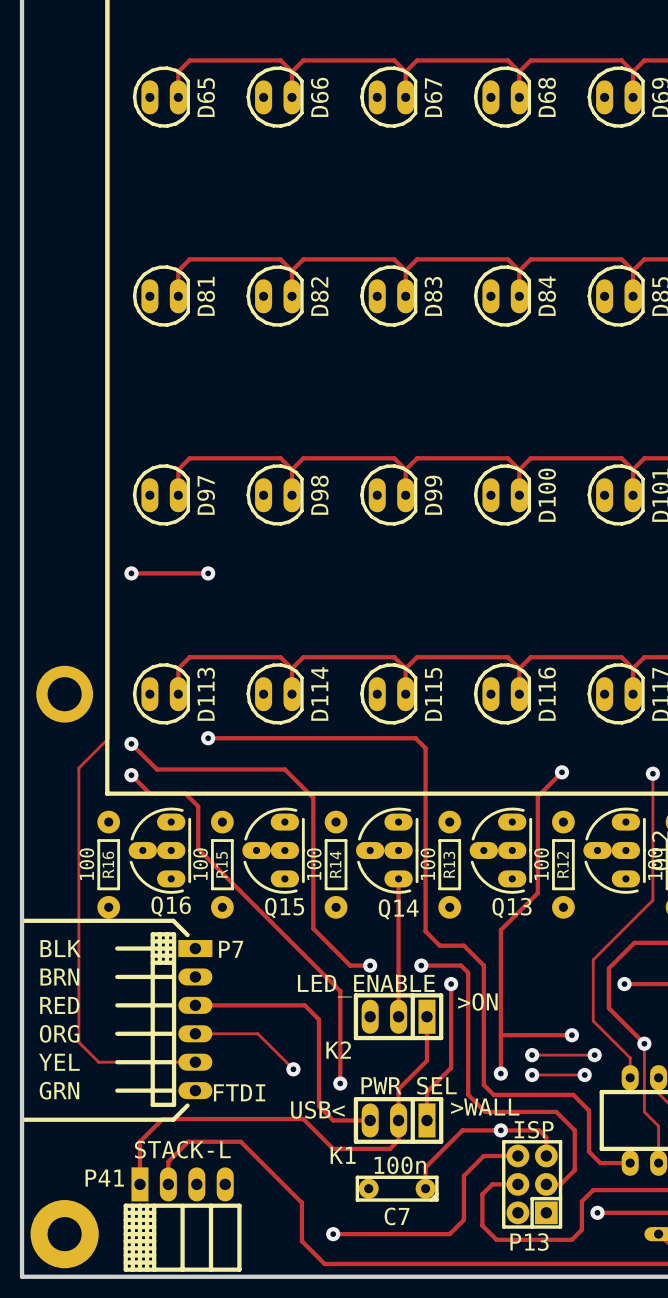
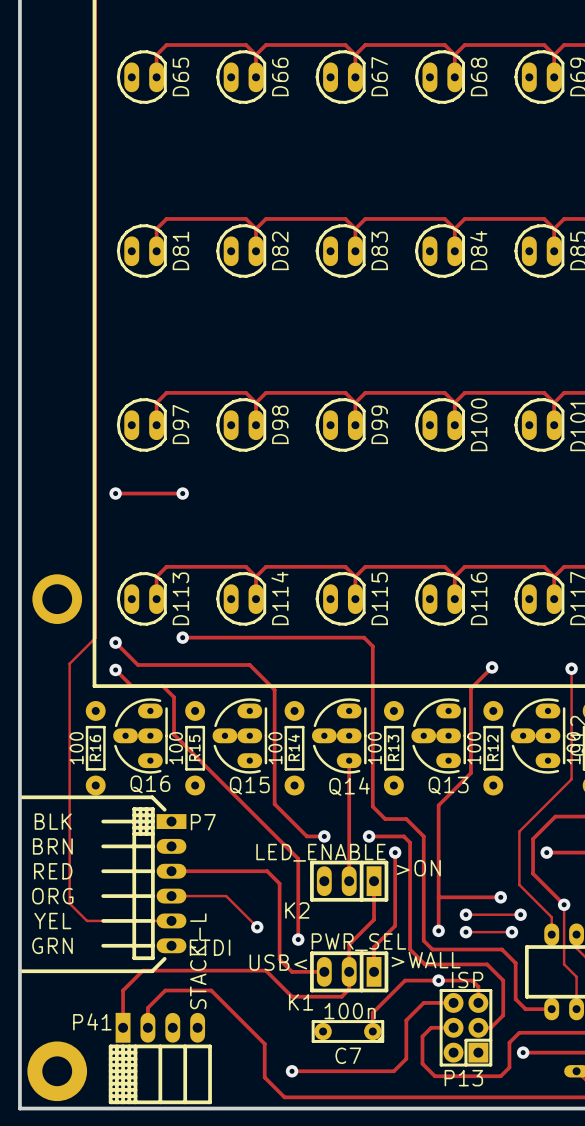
P41 value rotation: 0° (182, 1149) -> 90° counterclockwise (198, 961)

